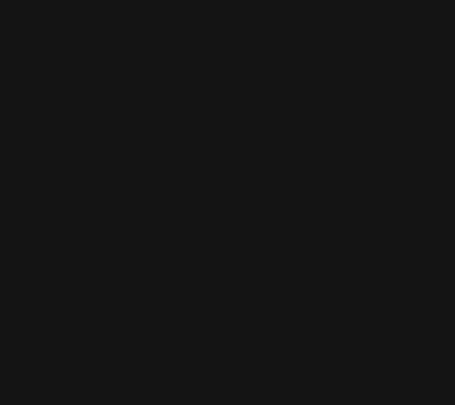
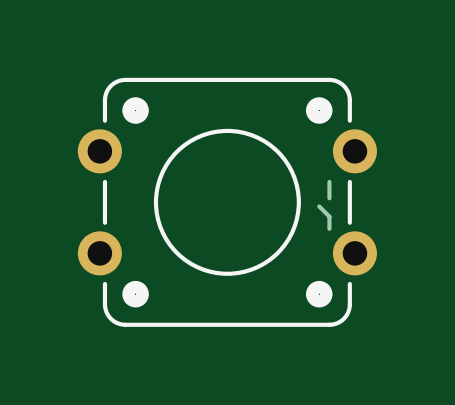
part: none -> (227, 202)

